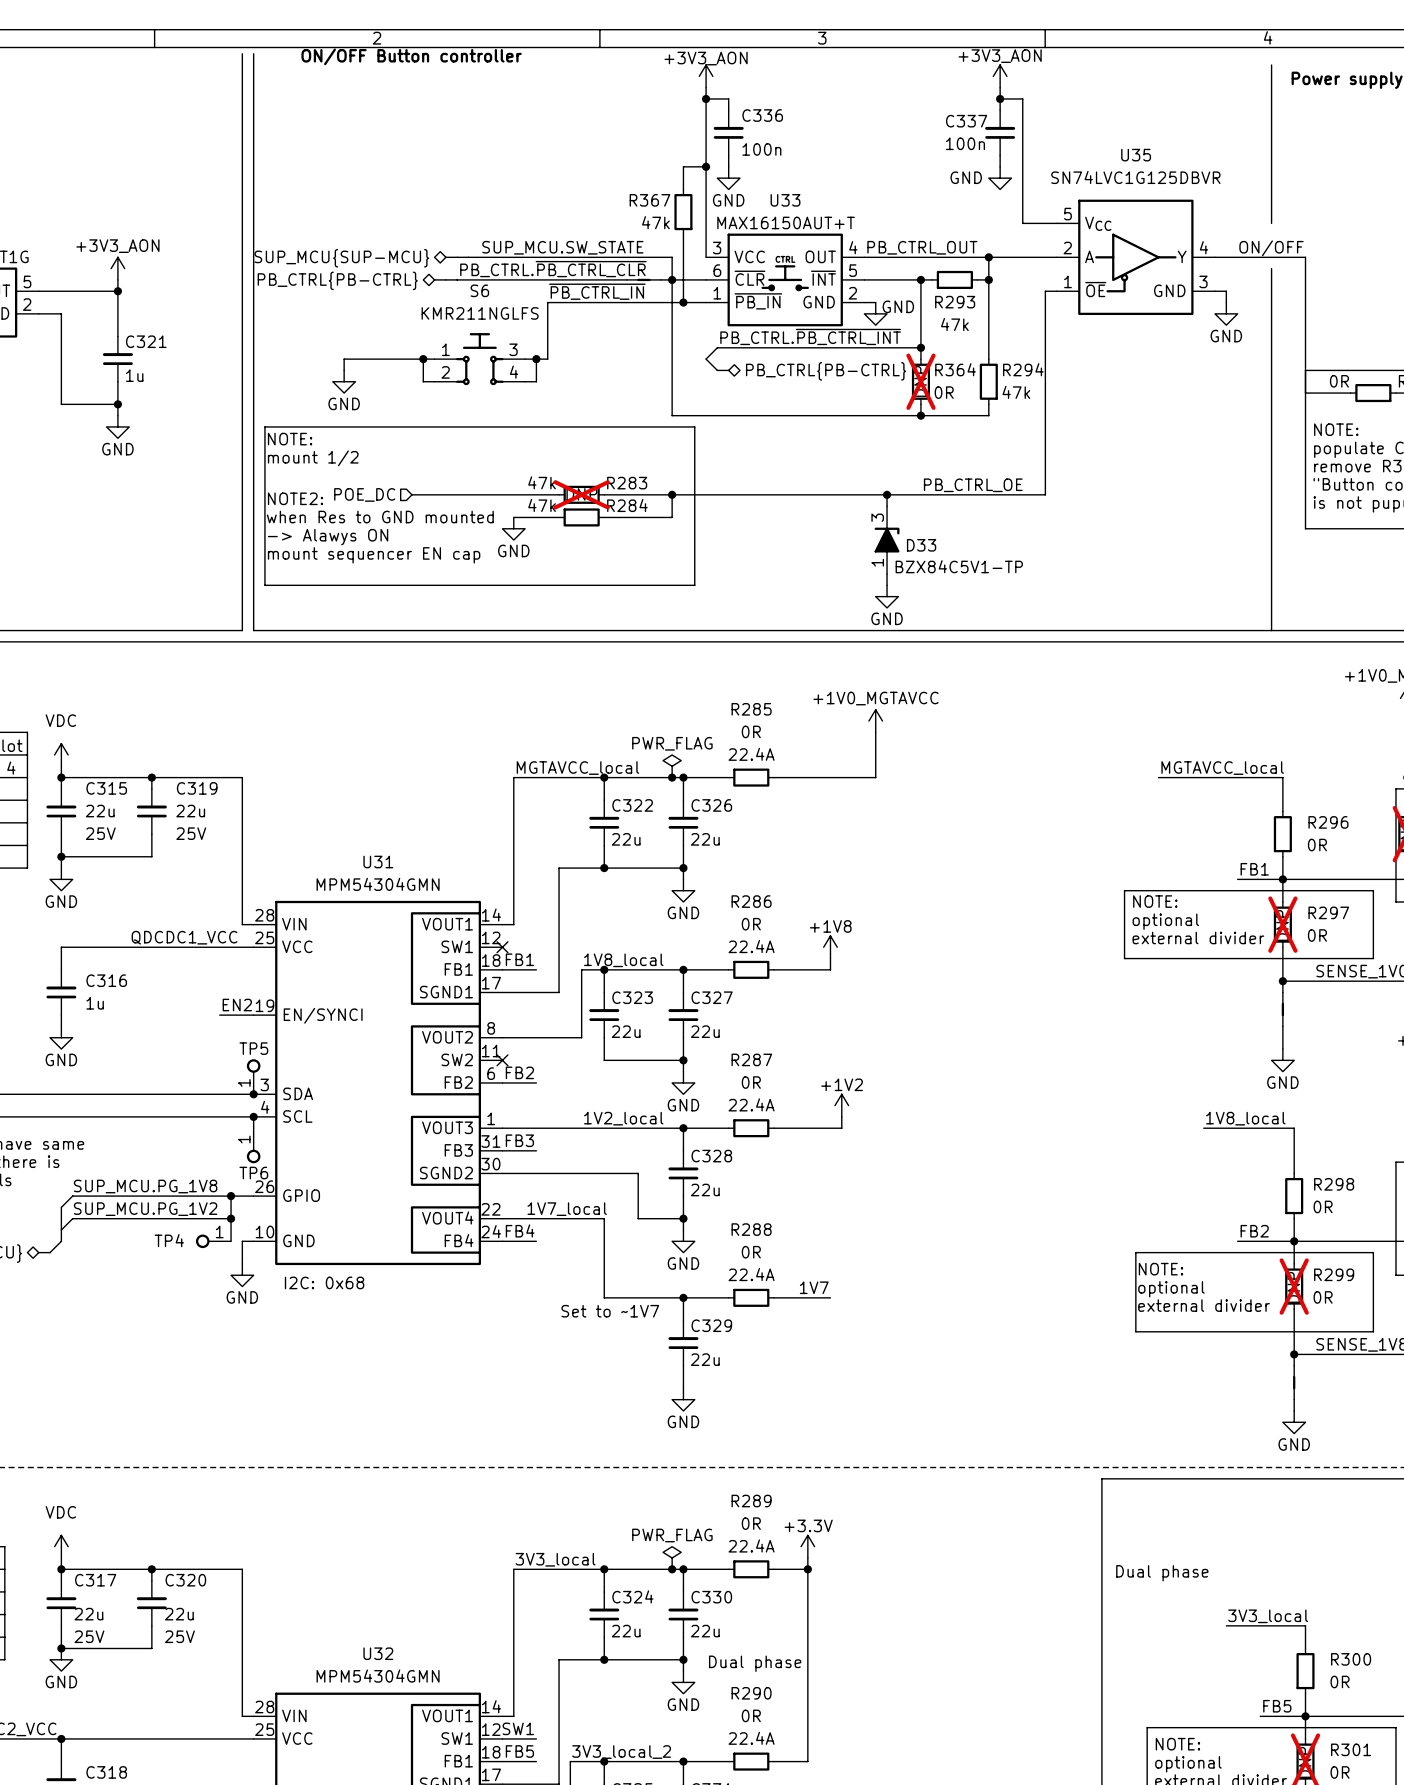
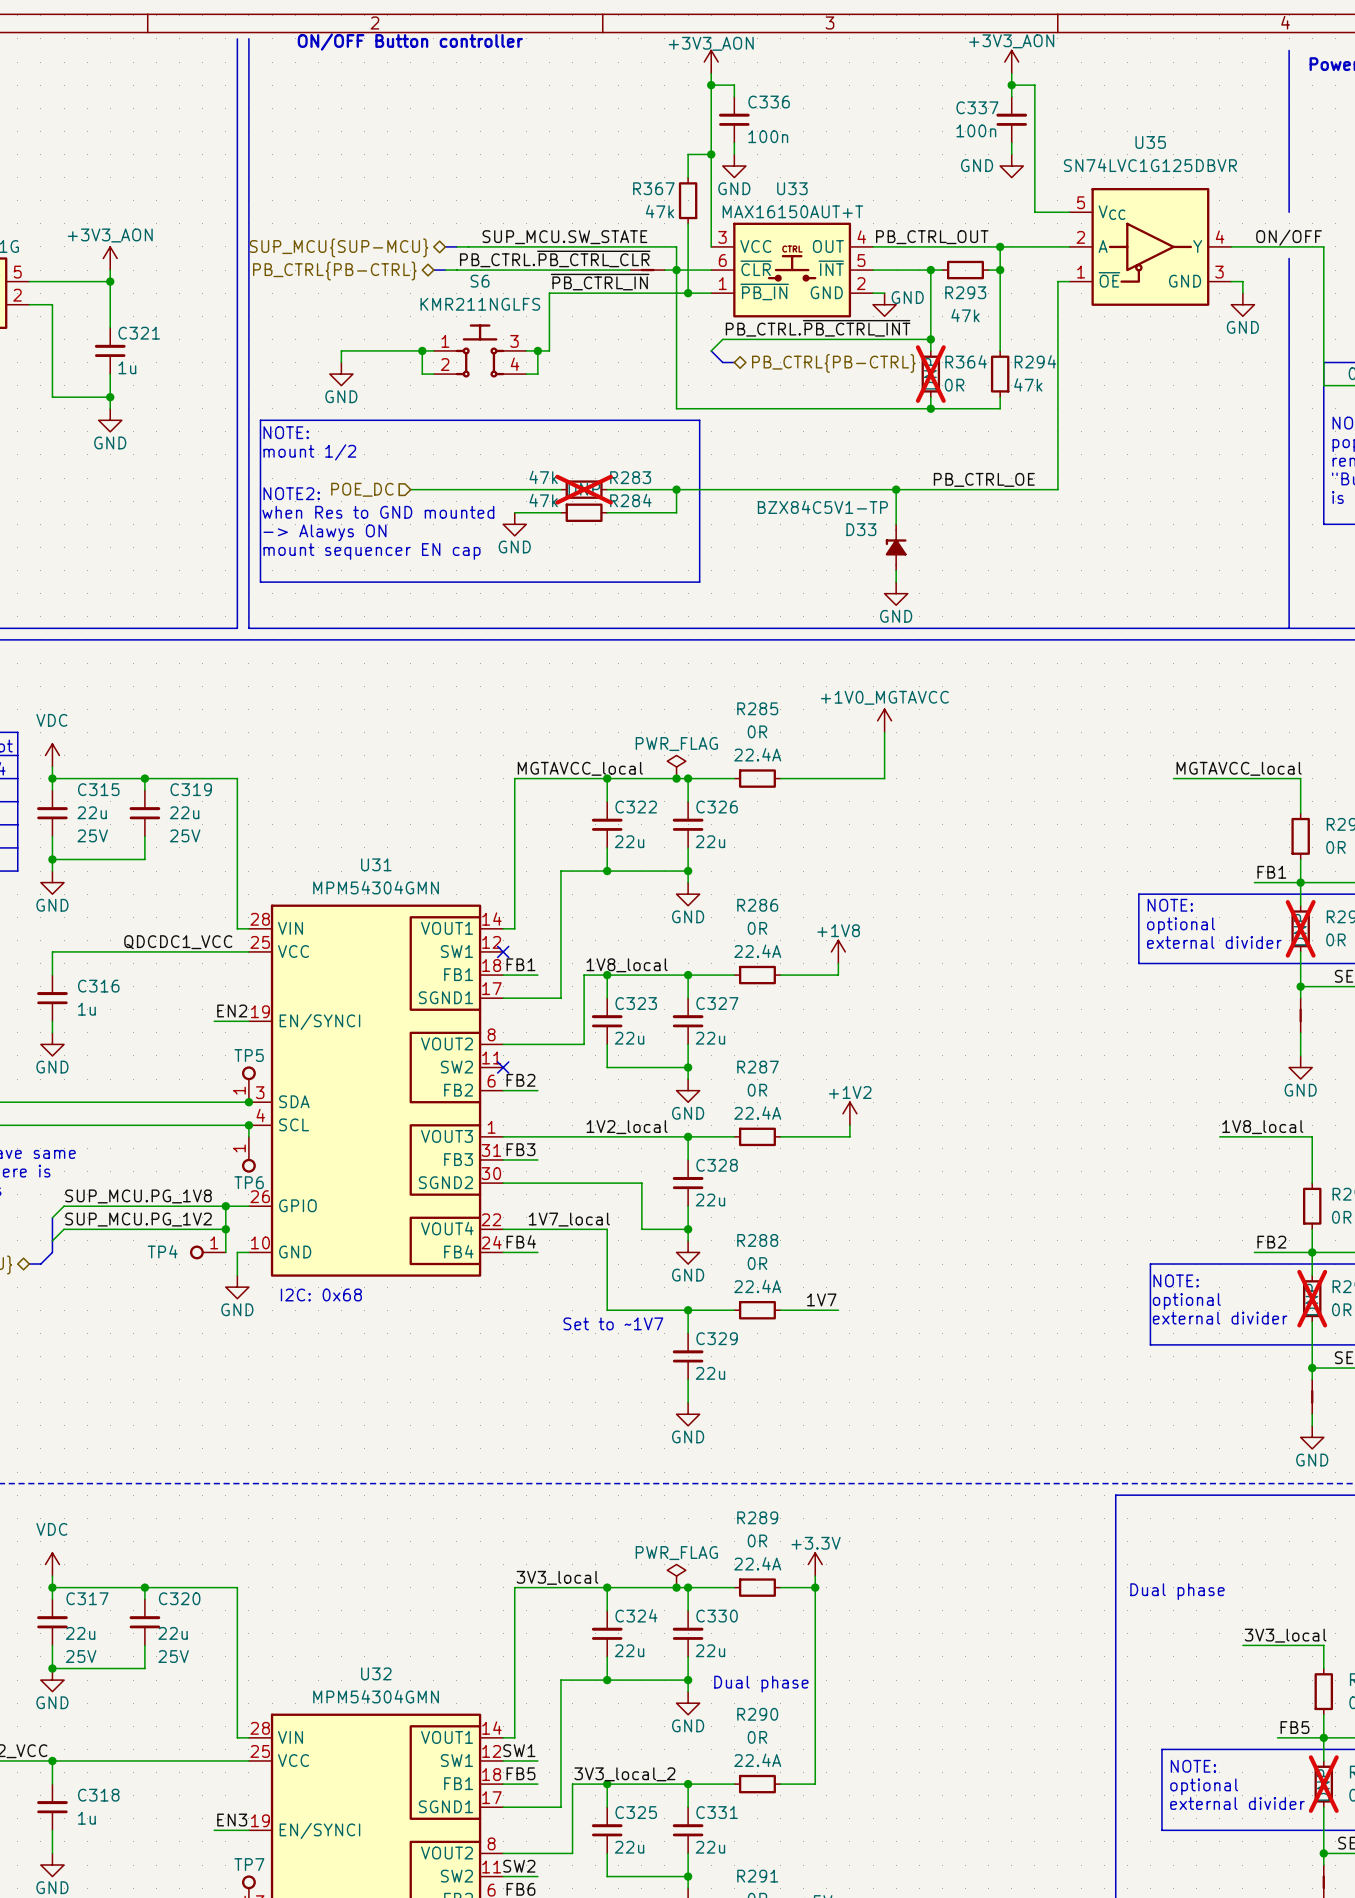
D33 symbol: [874, 506, 900, 575] -> [885, 524, 907, 571]
D33 name position: D33 (921, 545) -> D33 (861, 529)
D33 value position: BZX84C5V1-TP (959, 566) -> BZX84C5V1-TP (822, 507)

